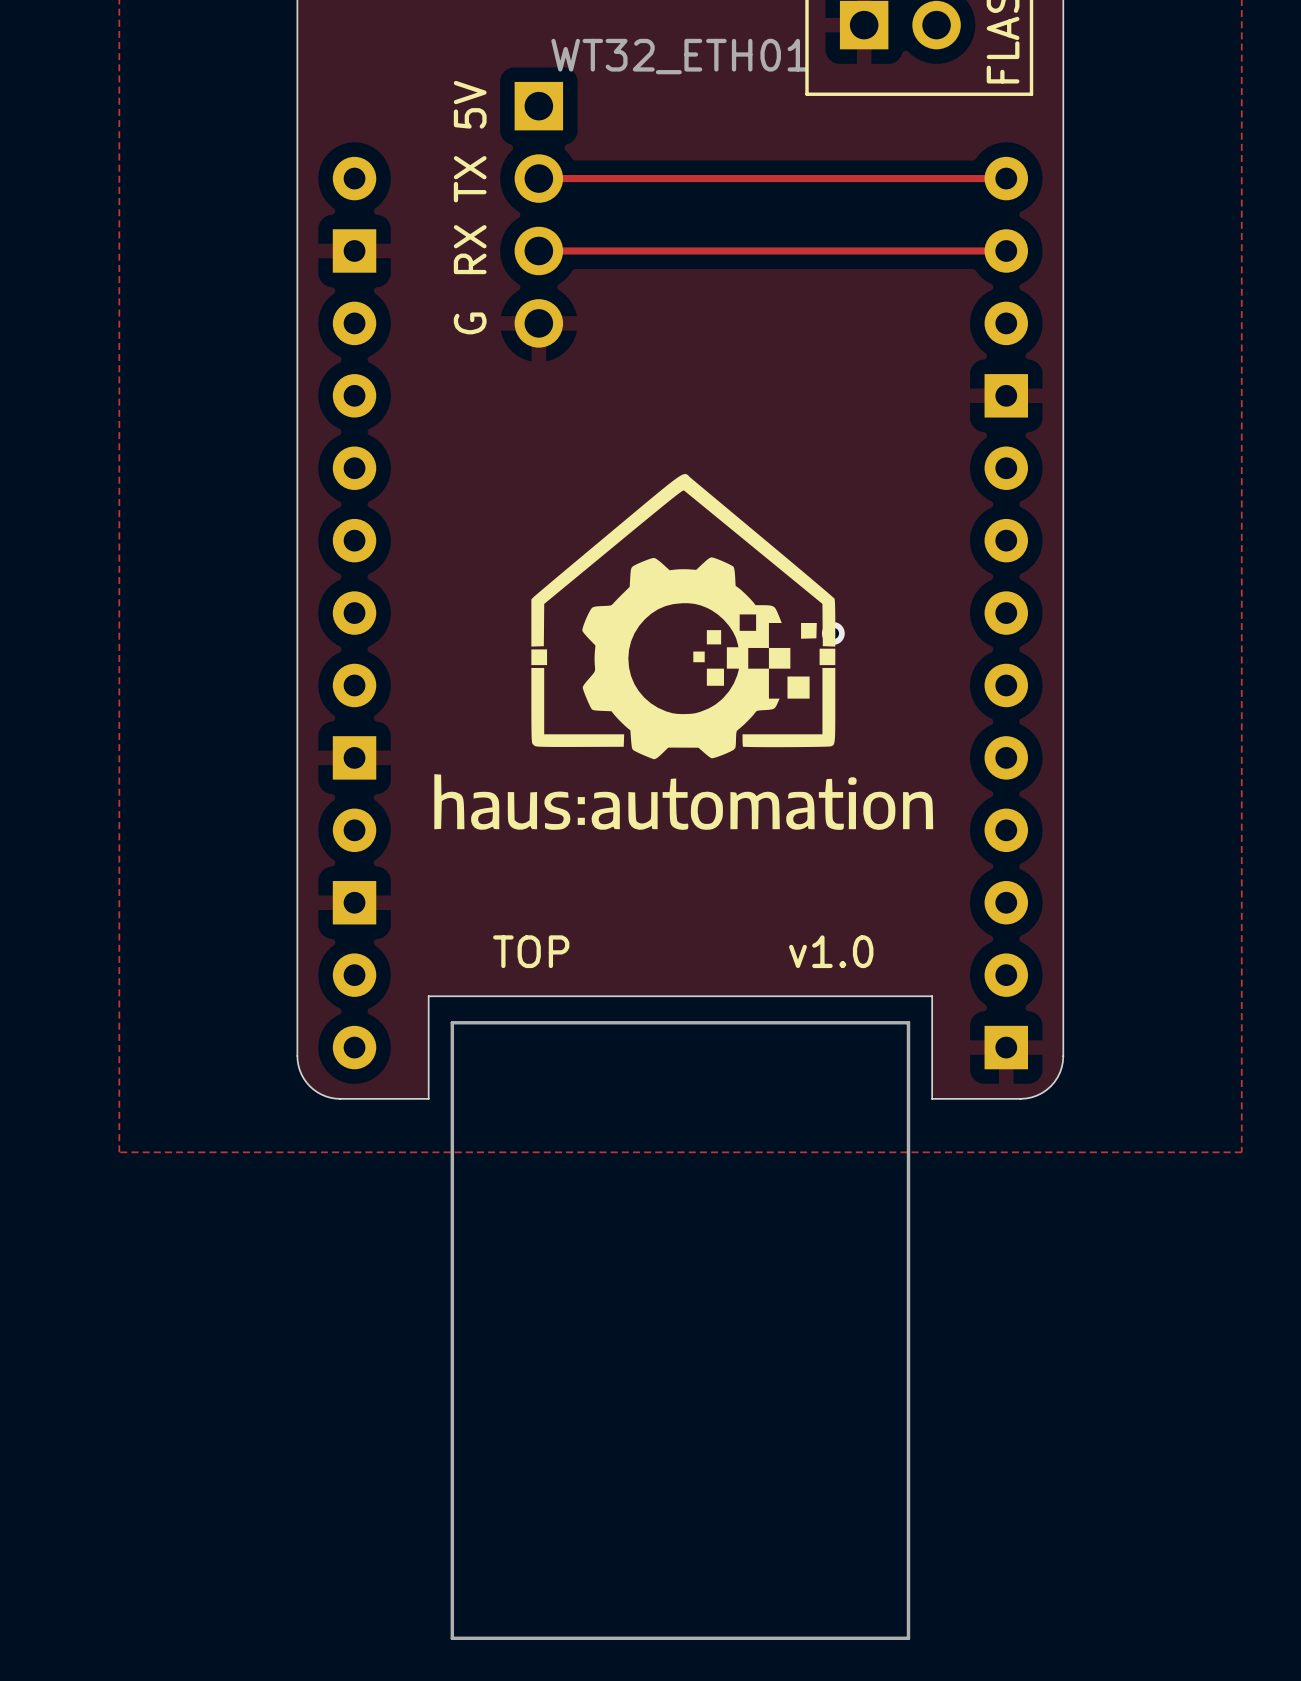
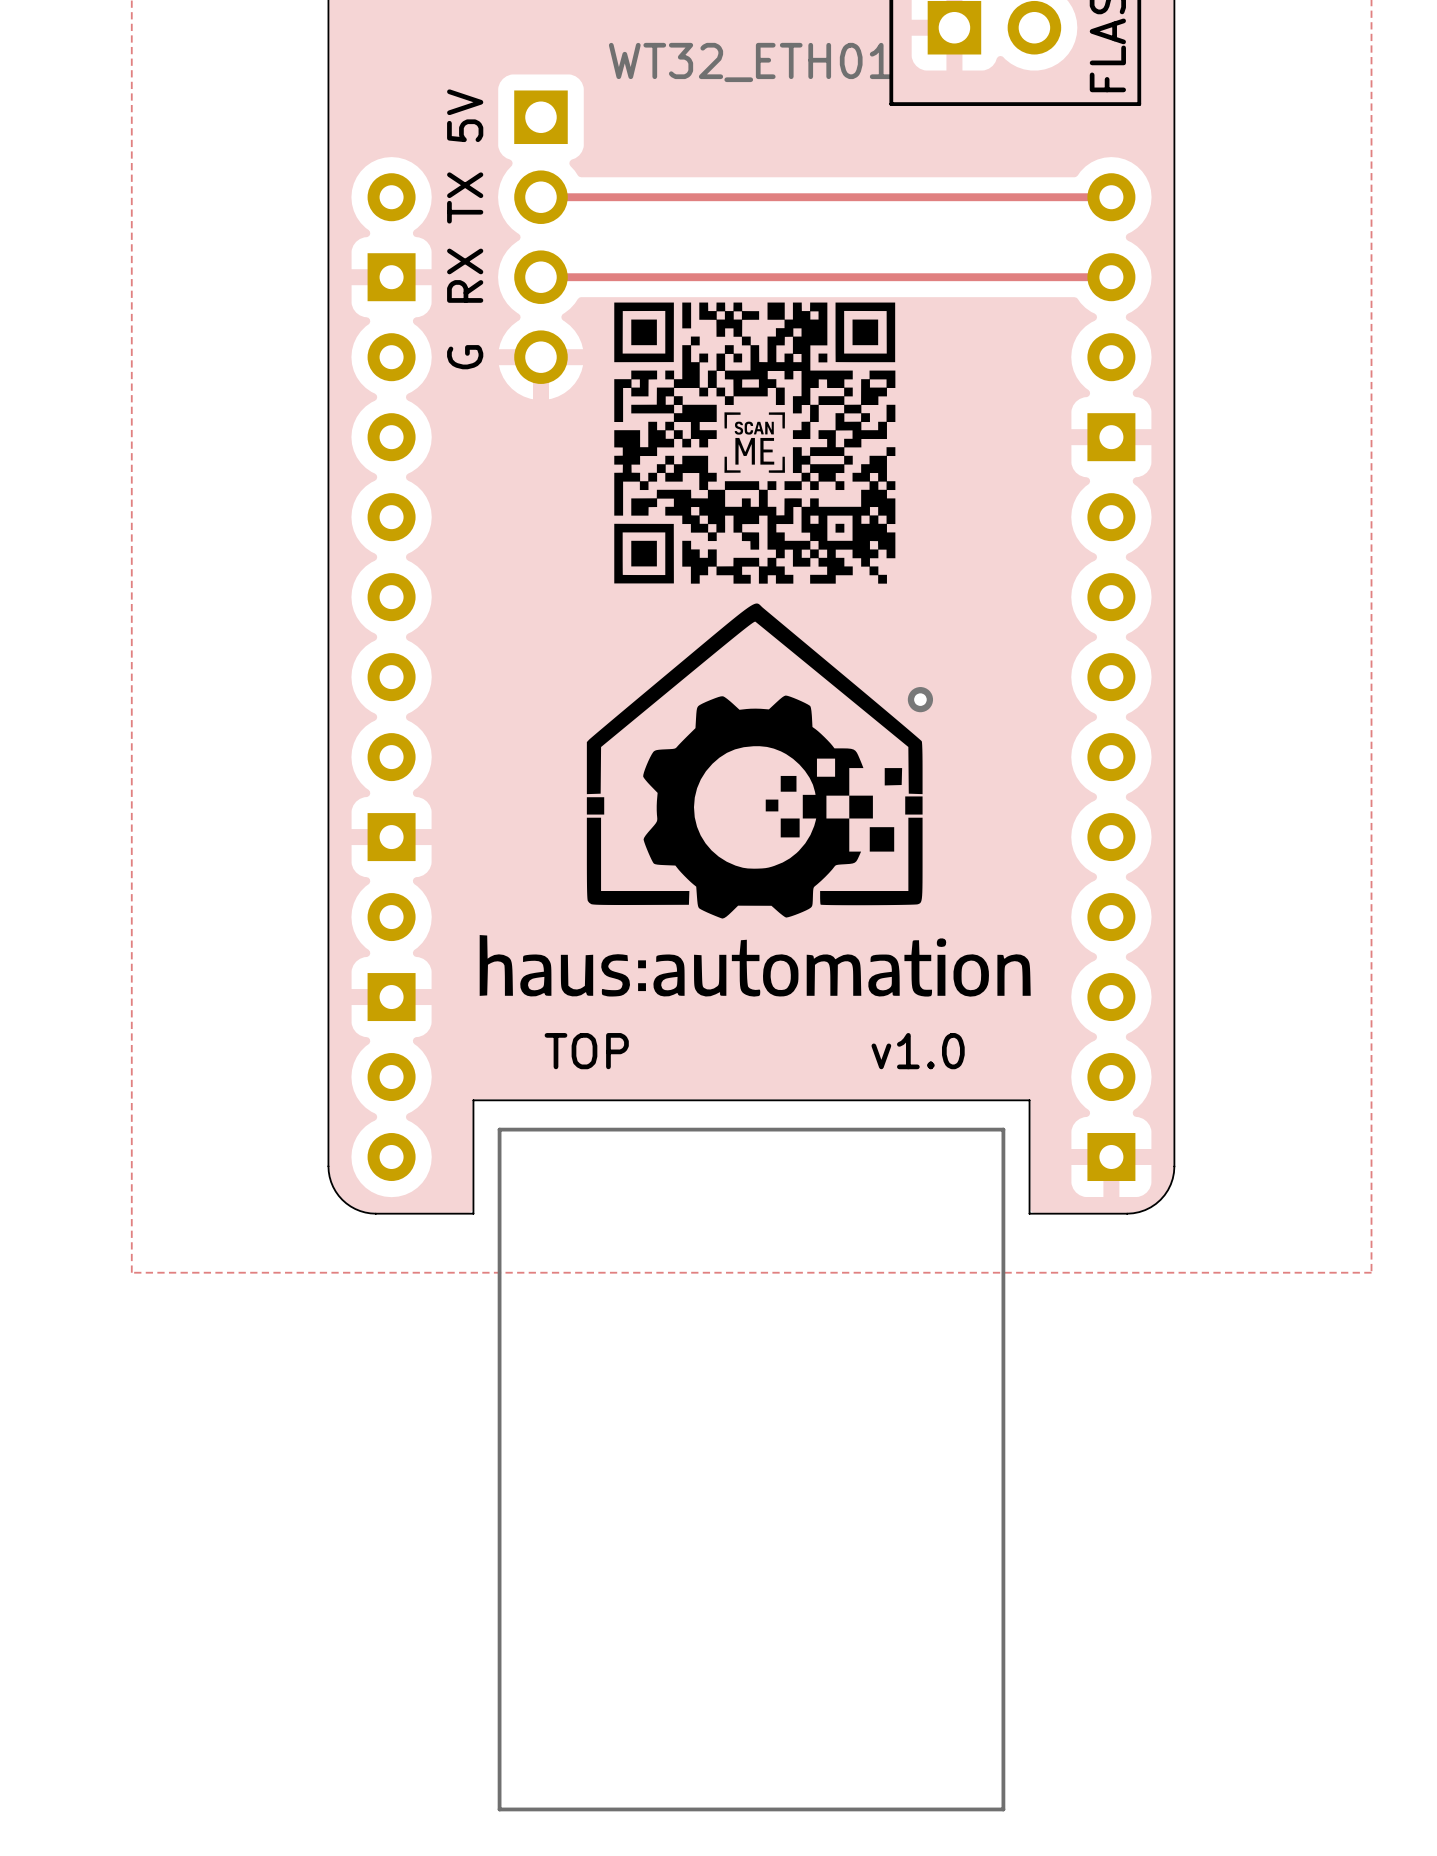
text position: 5V (470, 104) -> 5V (465, 115)
track: none -> (540, 197) (595, 197)
text position: TX (470, 179) -> TX (465, 197)
part position: (538, 214) -> (540, 237)
text position: RX (470, 249) -> RX (465, 275)
track: none -> (540, 277) (595, 277)
drawing: none -> [614, 302, 896, 584]
text position: G (470, 323) -> G (465, 357)
drawing position: (683, 651) -> (755, 800)

